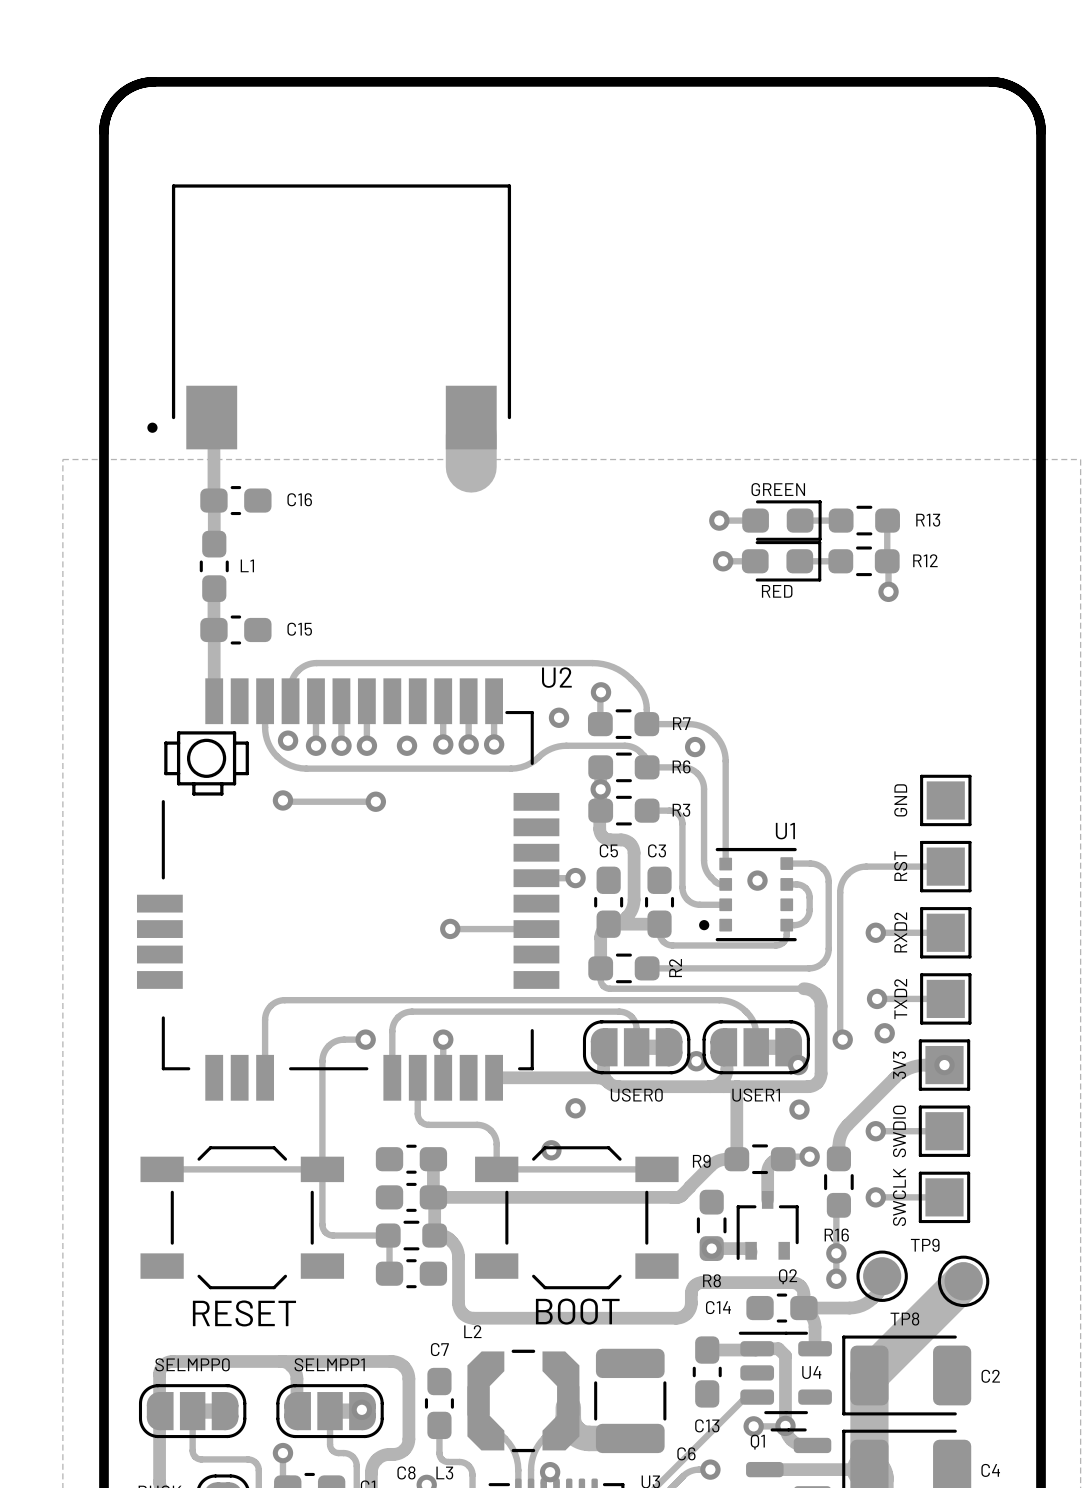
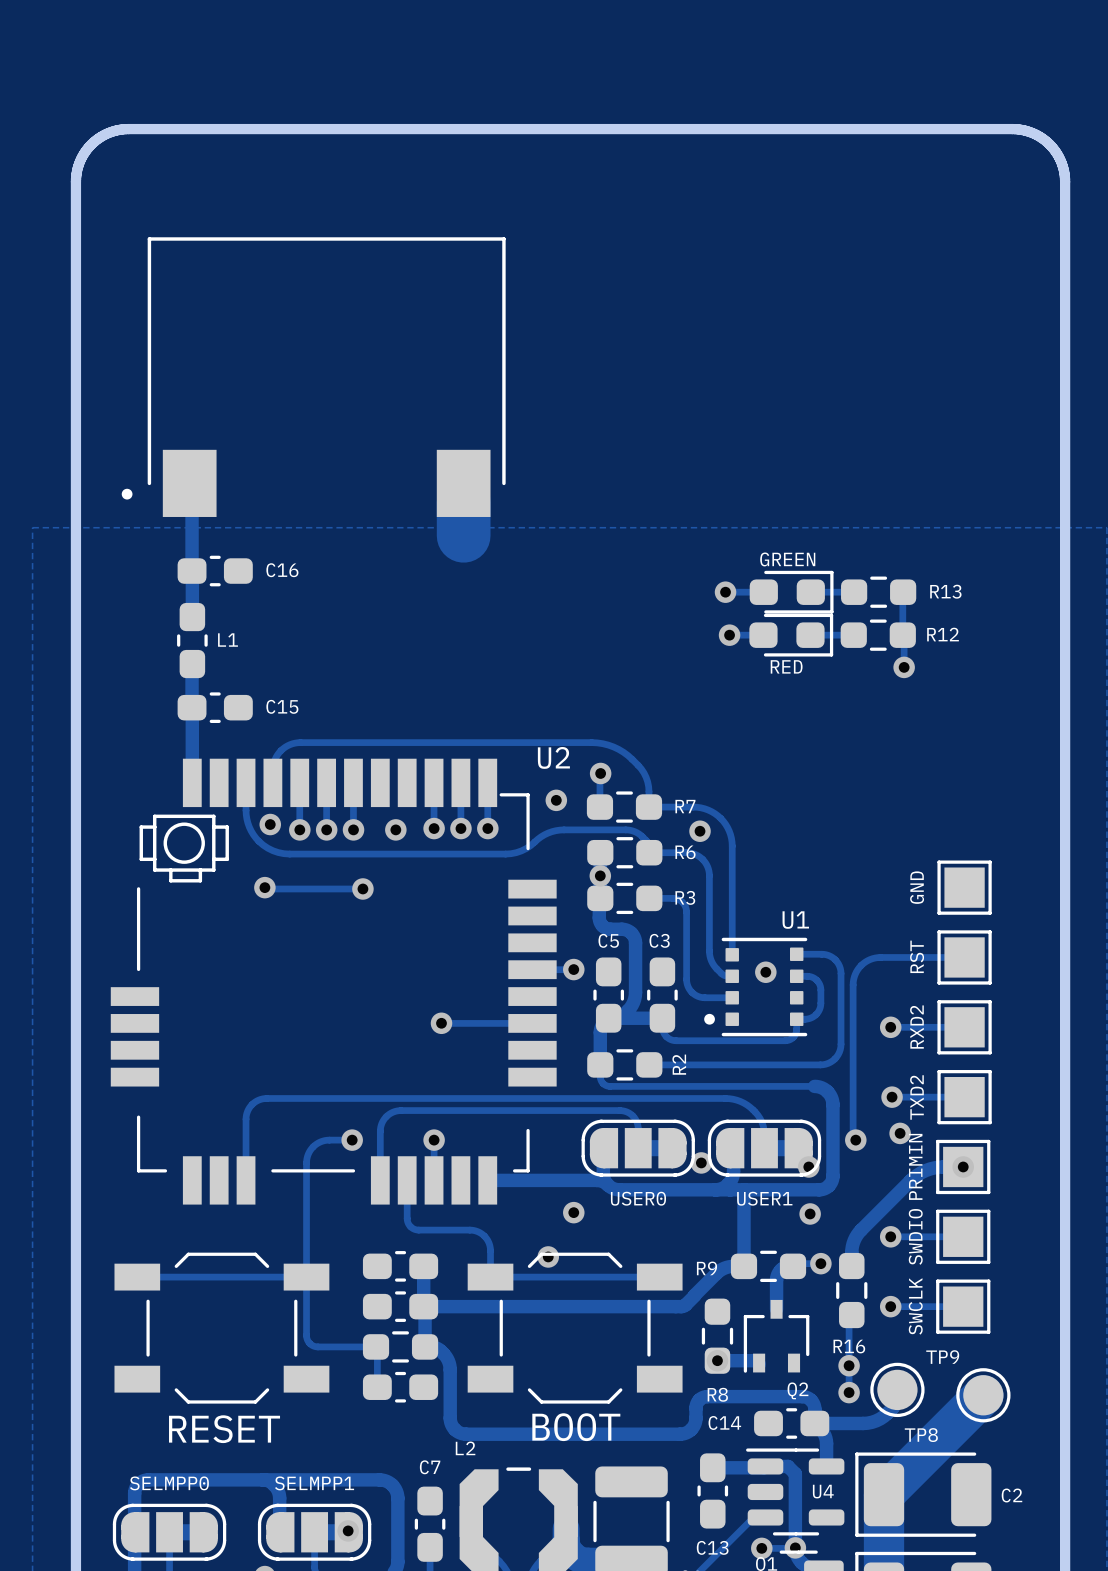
part value: 3V3 (899, 1065) -> PRIMIN (915, 1166)

